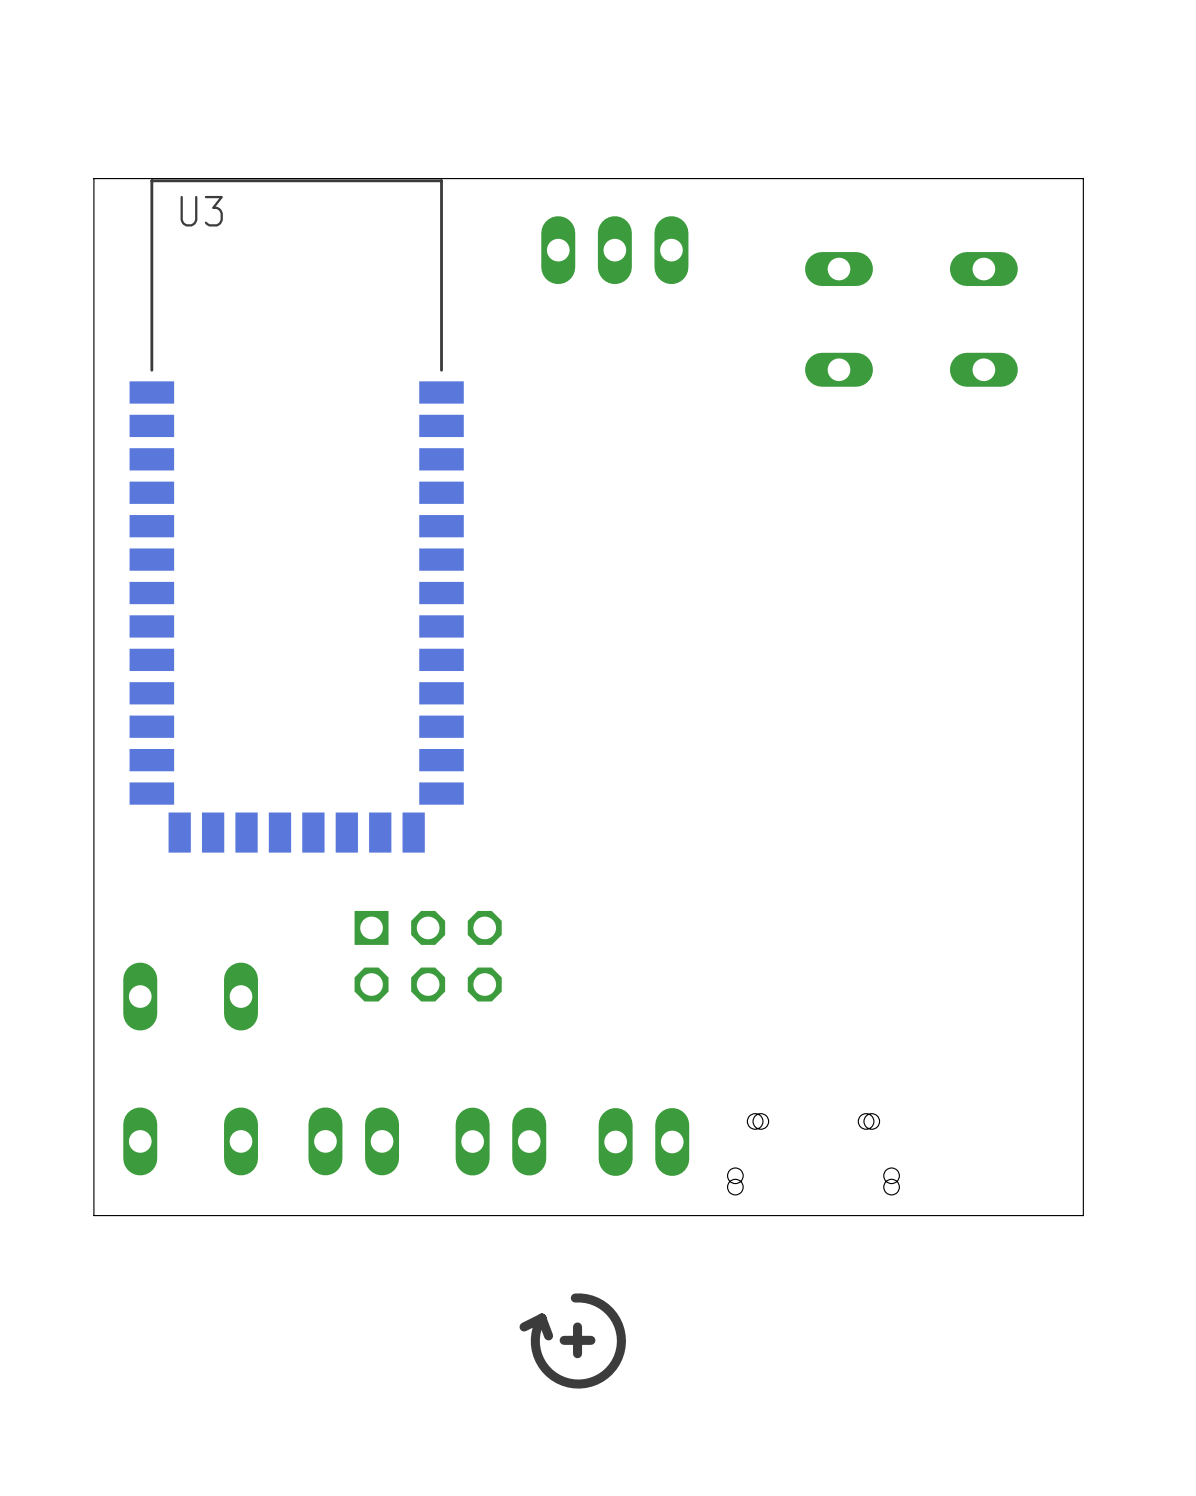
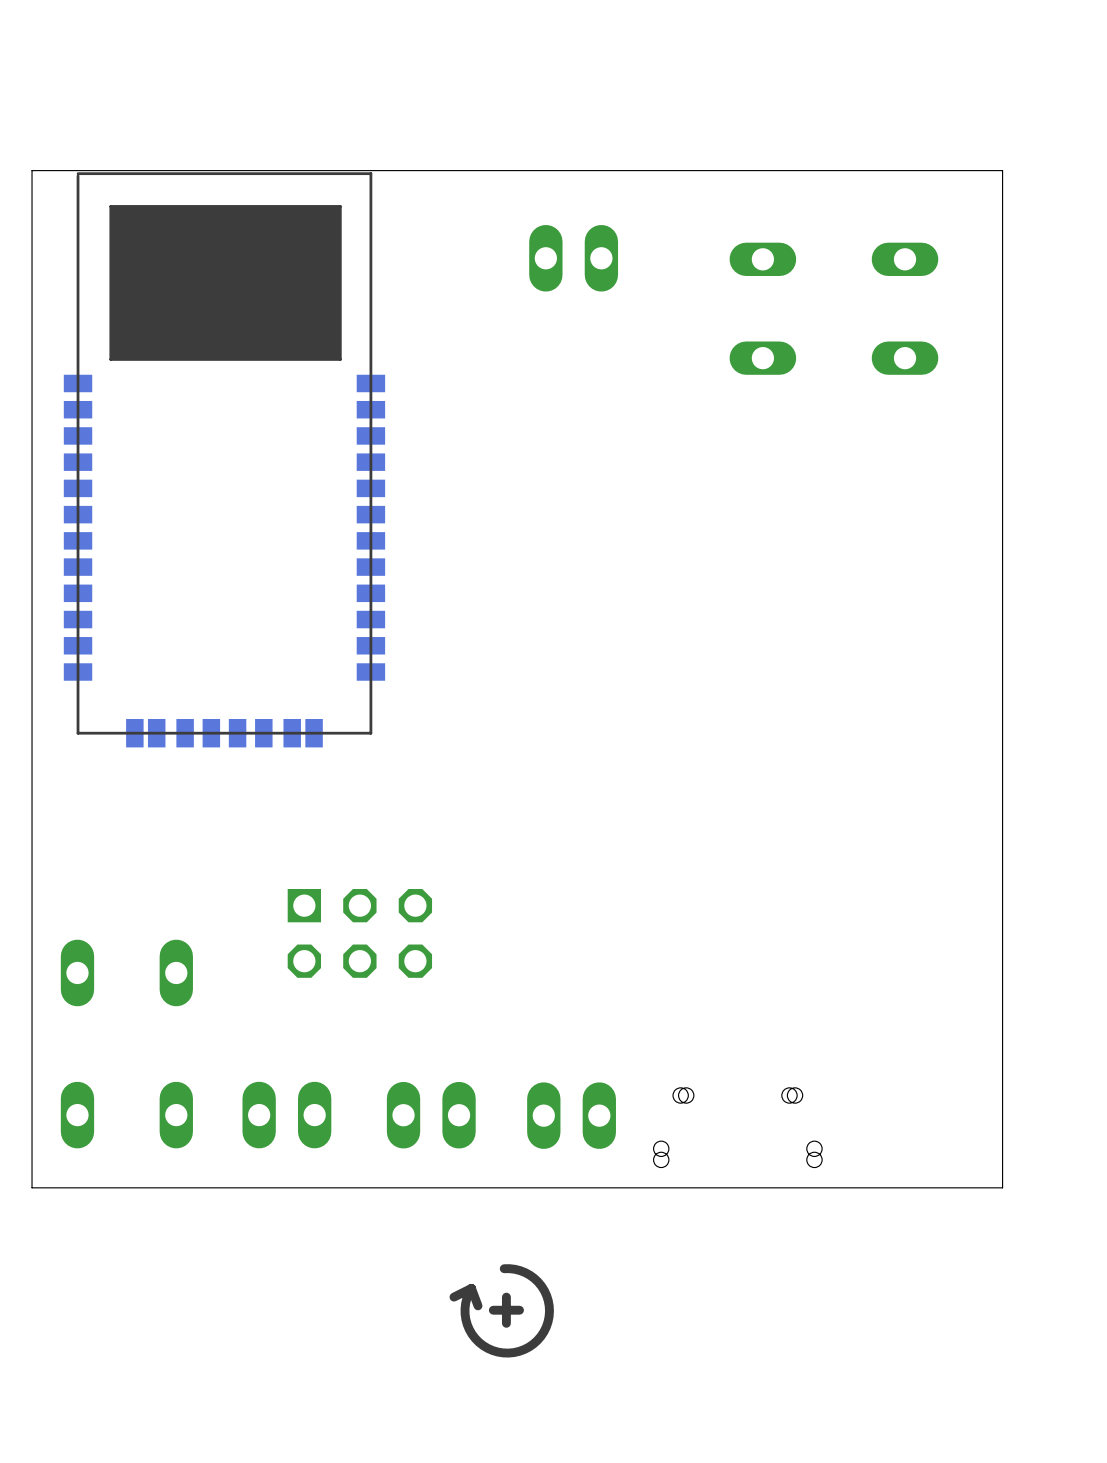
part: (614, 250) -> none
part: none -> (573, 258)
part: none -> (224, 459)
U3: (296, 516) -> none

